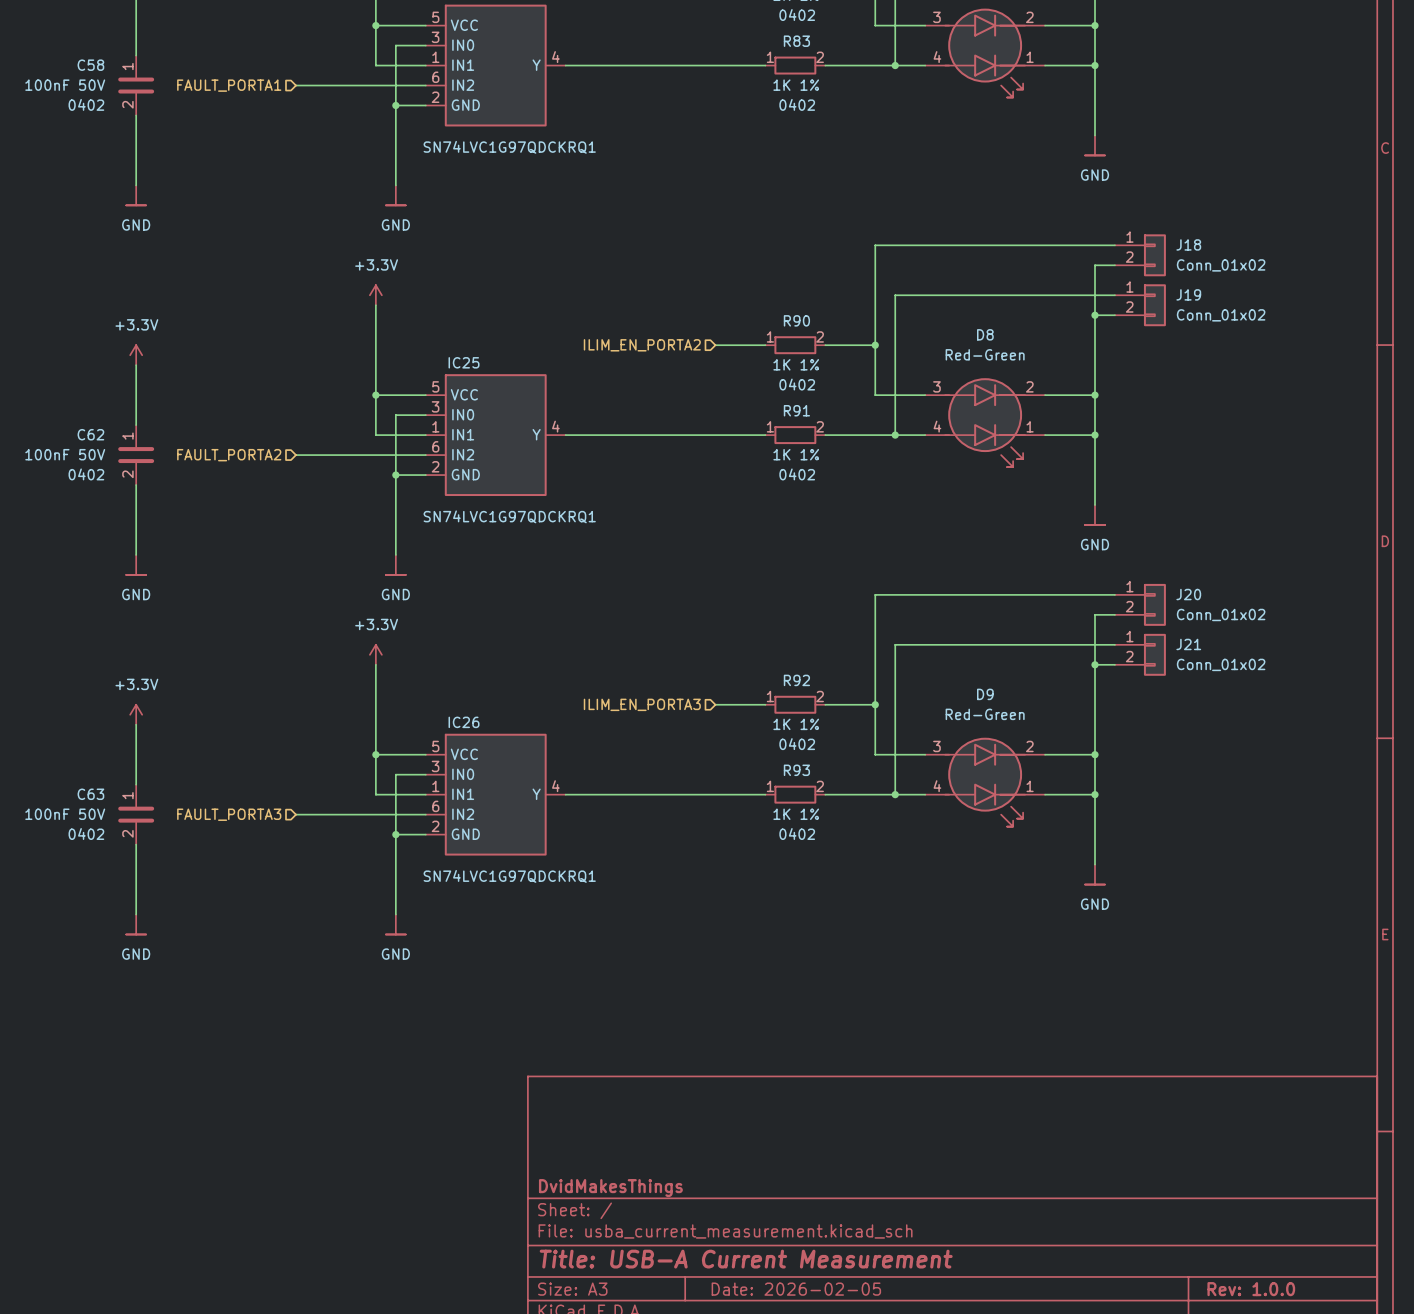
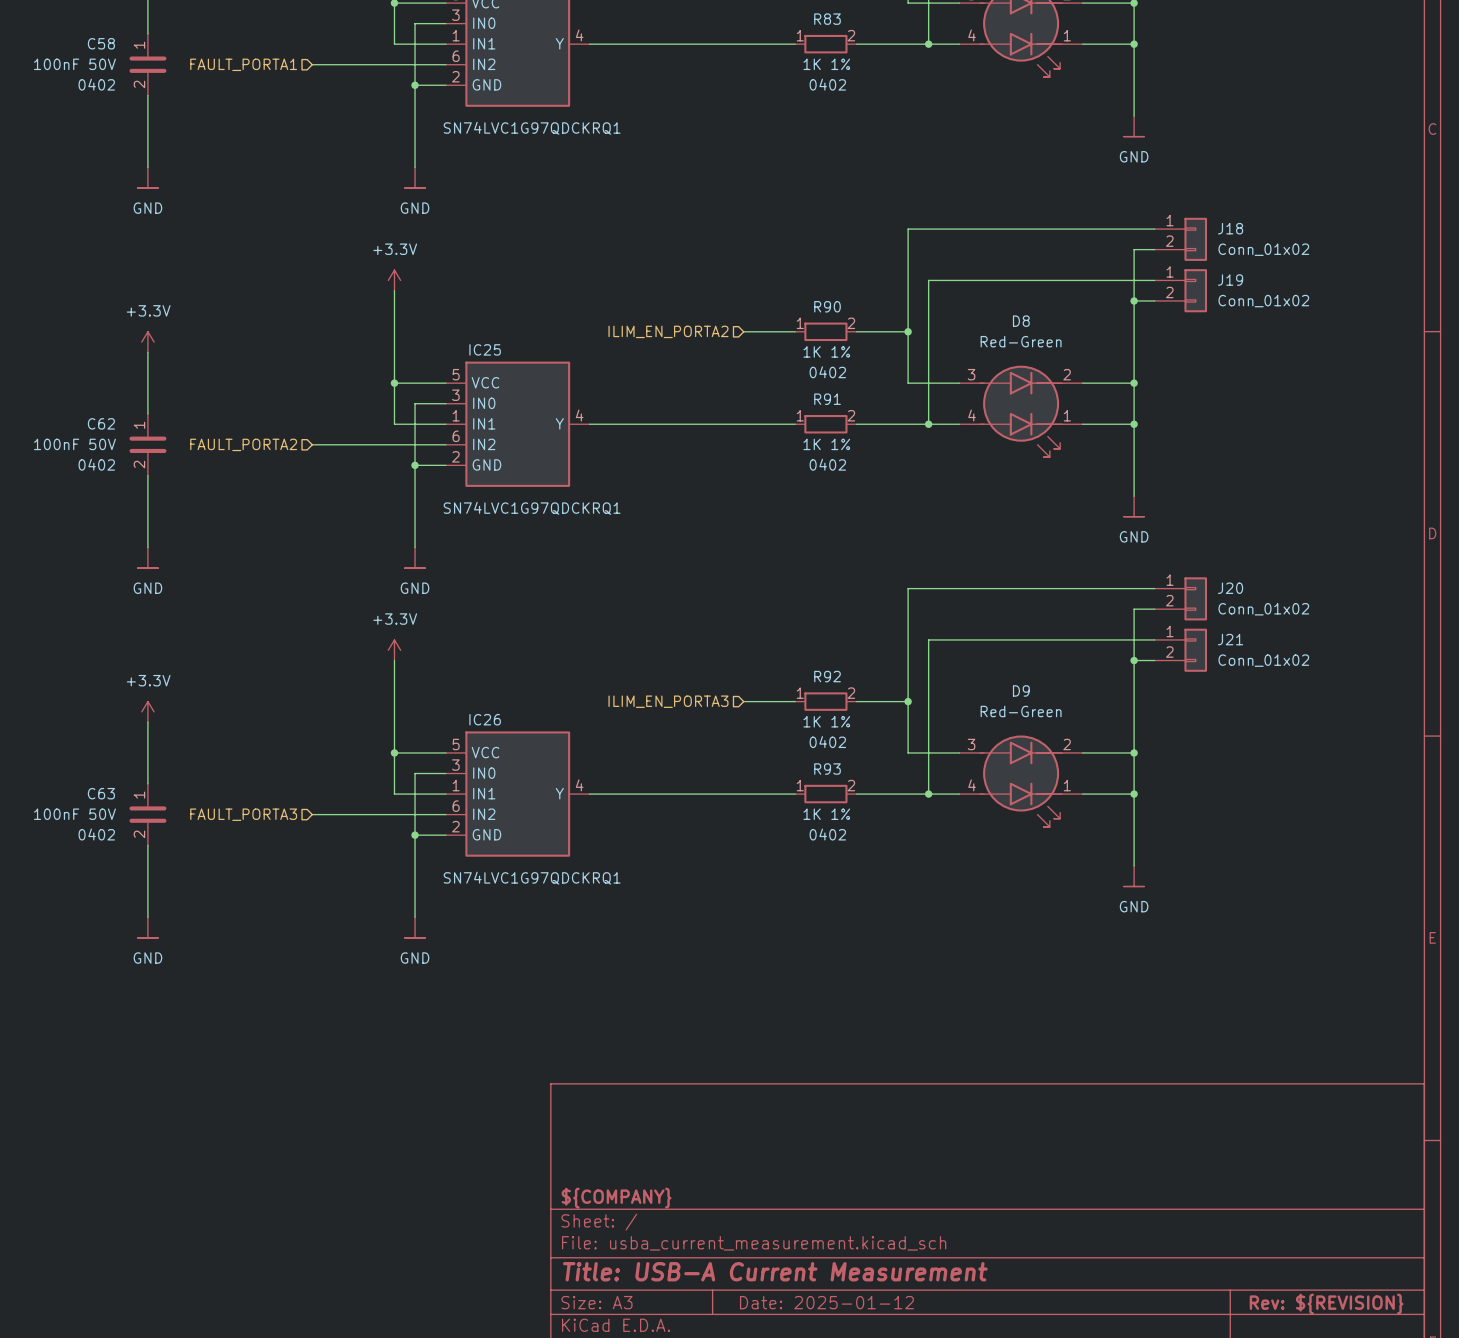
title block: DvidMakesThings (610, 1188) -> ${COMPANY} (616, 1198)
title block: Date: 2026-02-05 (796, 1289) -> Date: 2025-01-12 (826, 1302)
title block: Rev: 1.0.0 (1251, 1289) -> Rev: ${REVISION} (1326, 1304)

